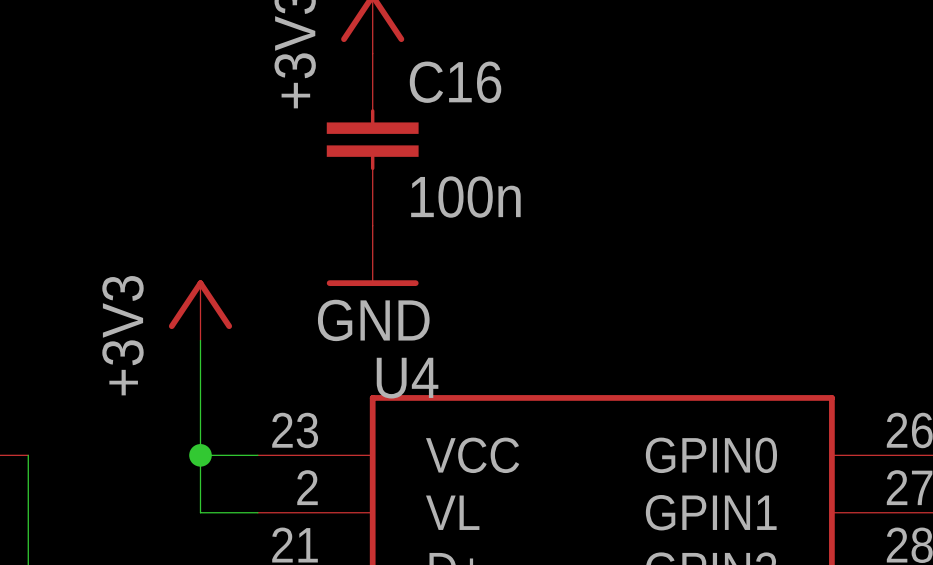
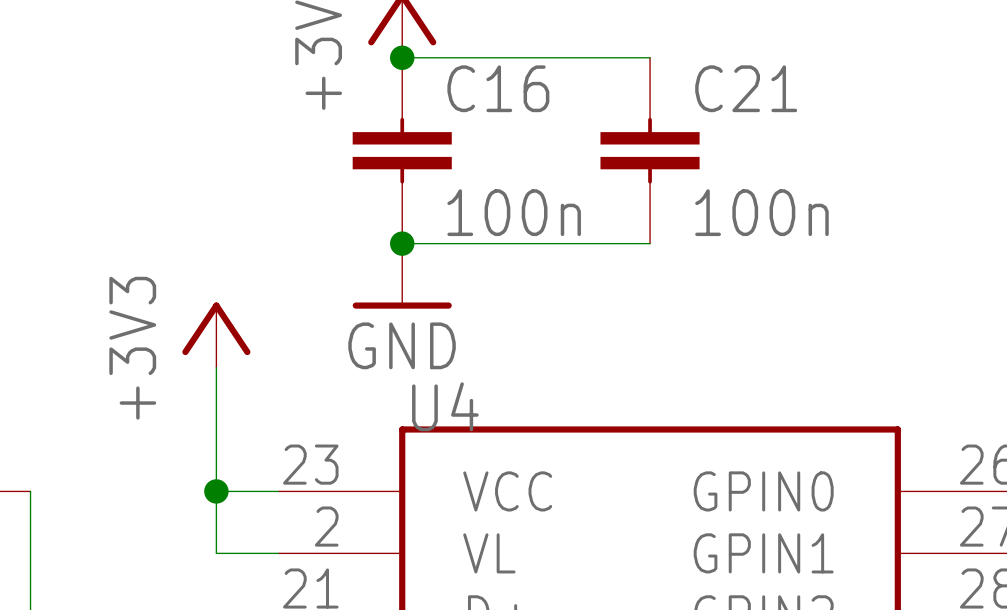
wire: none -> (402, 57) (650, 57)
junction: none -> (402, 57)
C21: none -> 100n (650, 150)
wire: none -> (402, 243) (650, 243)
junction: none -> (402, 243)

